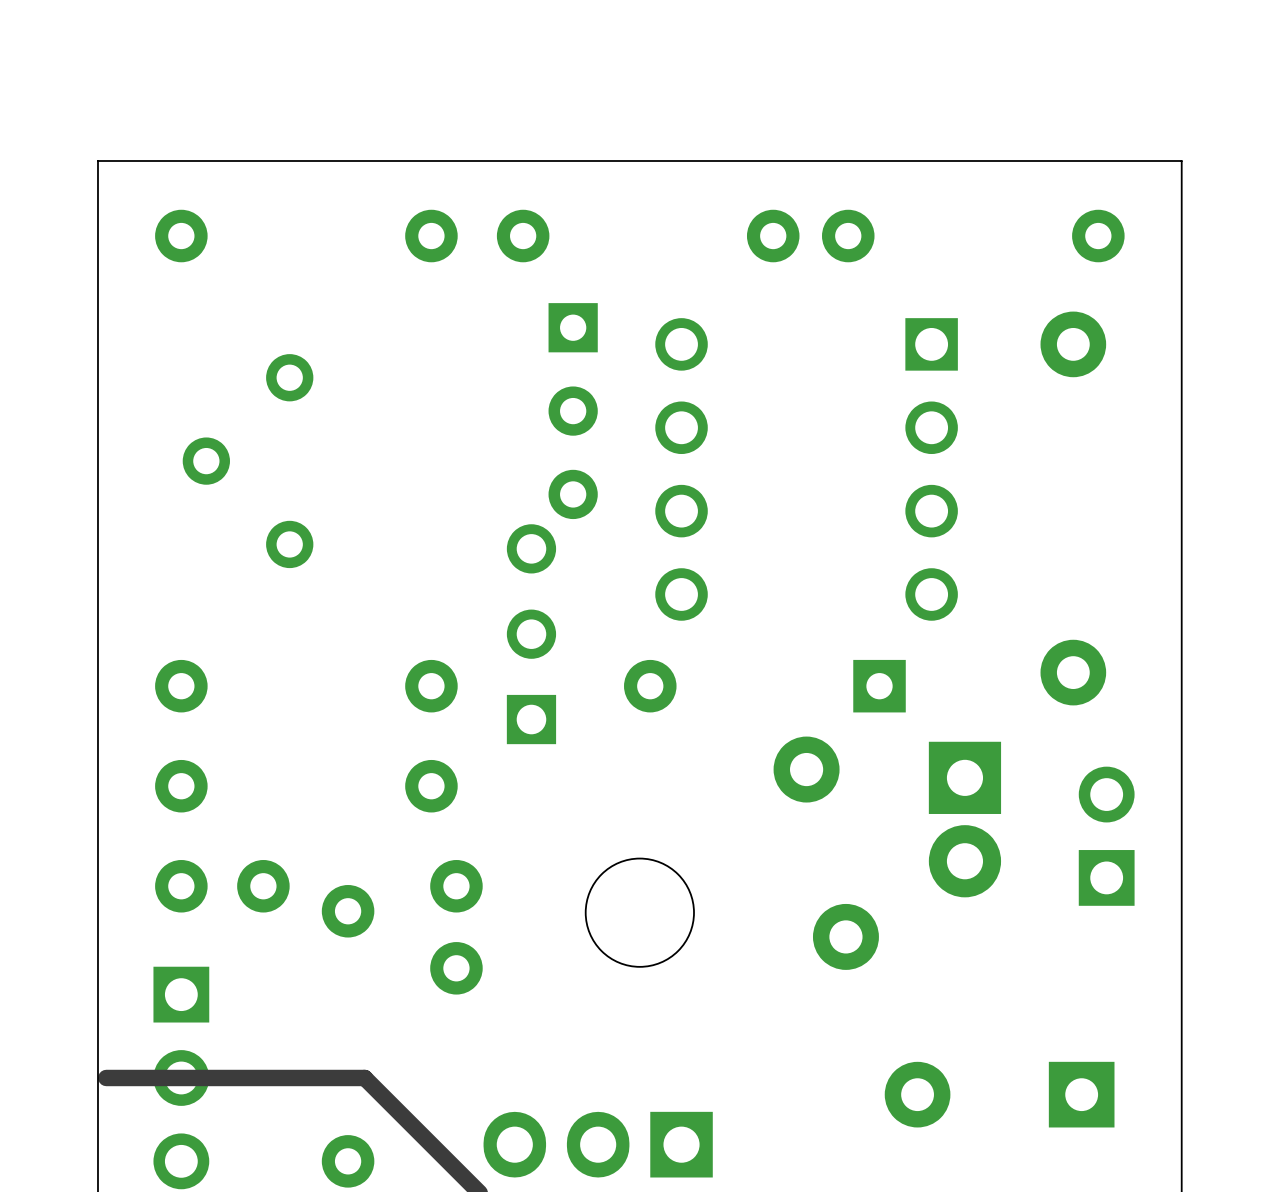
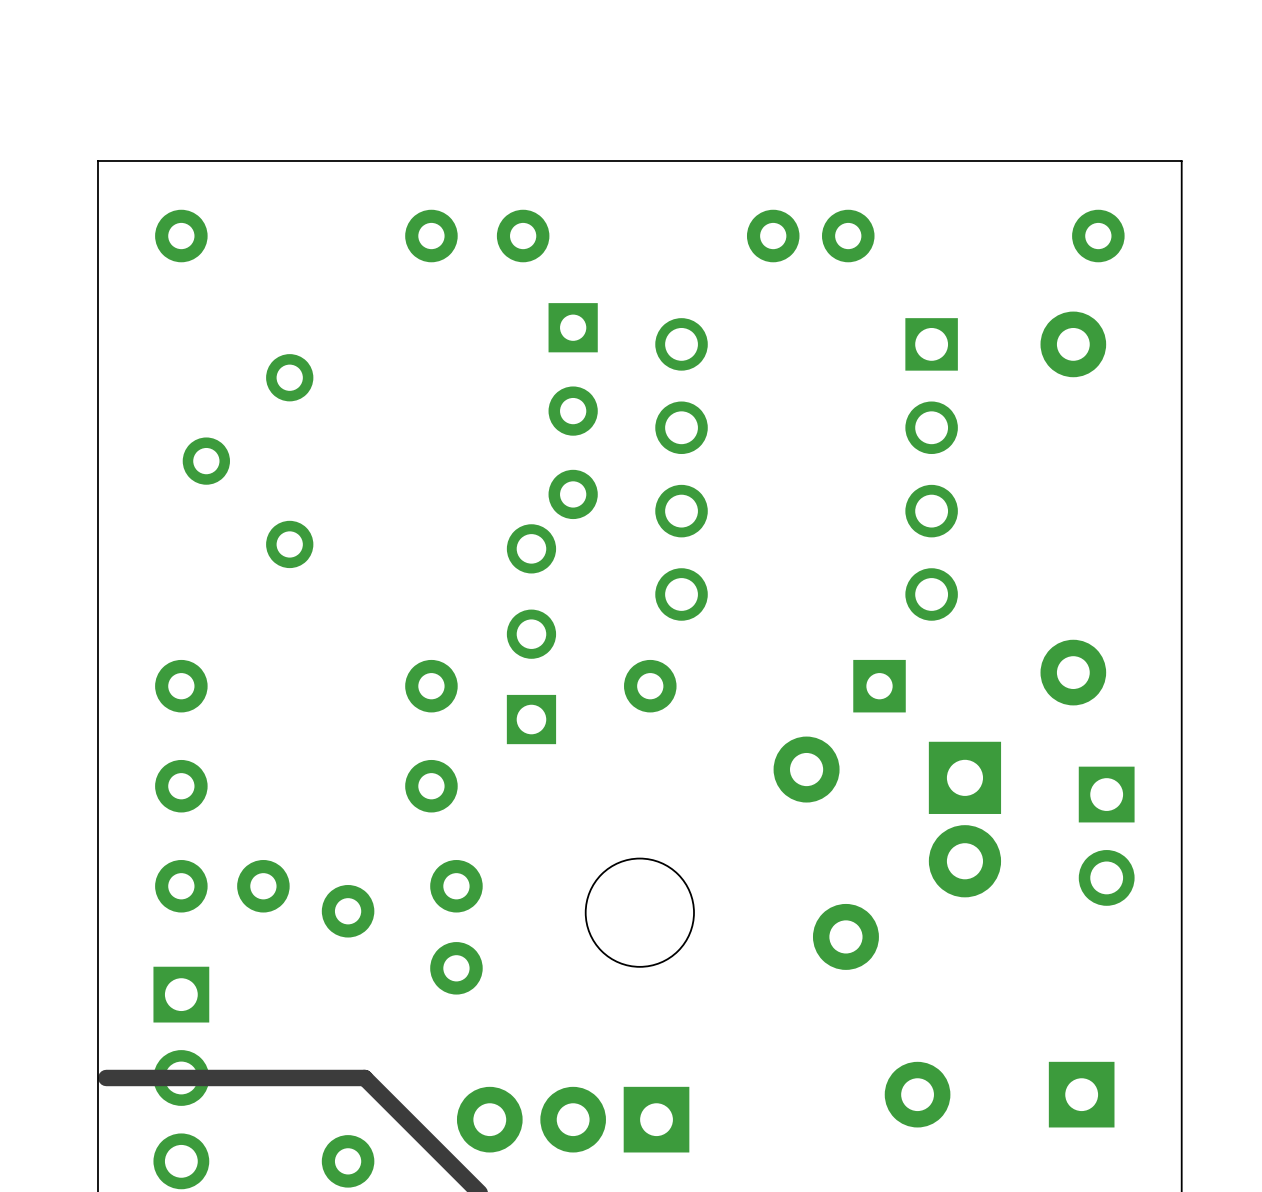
part rotation: 0° (1106, 836) -> 180° (1106, 836)
part: none -> (573, 1119)
part: (598, 1144) -> none

